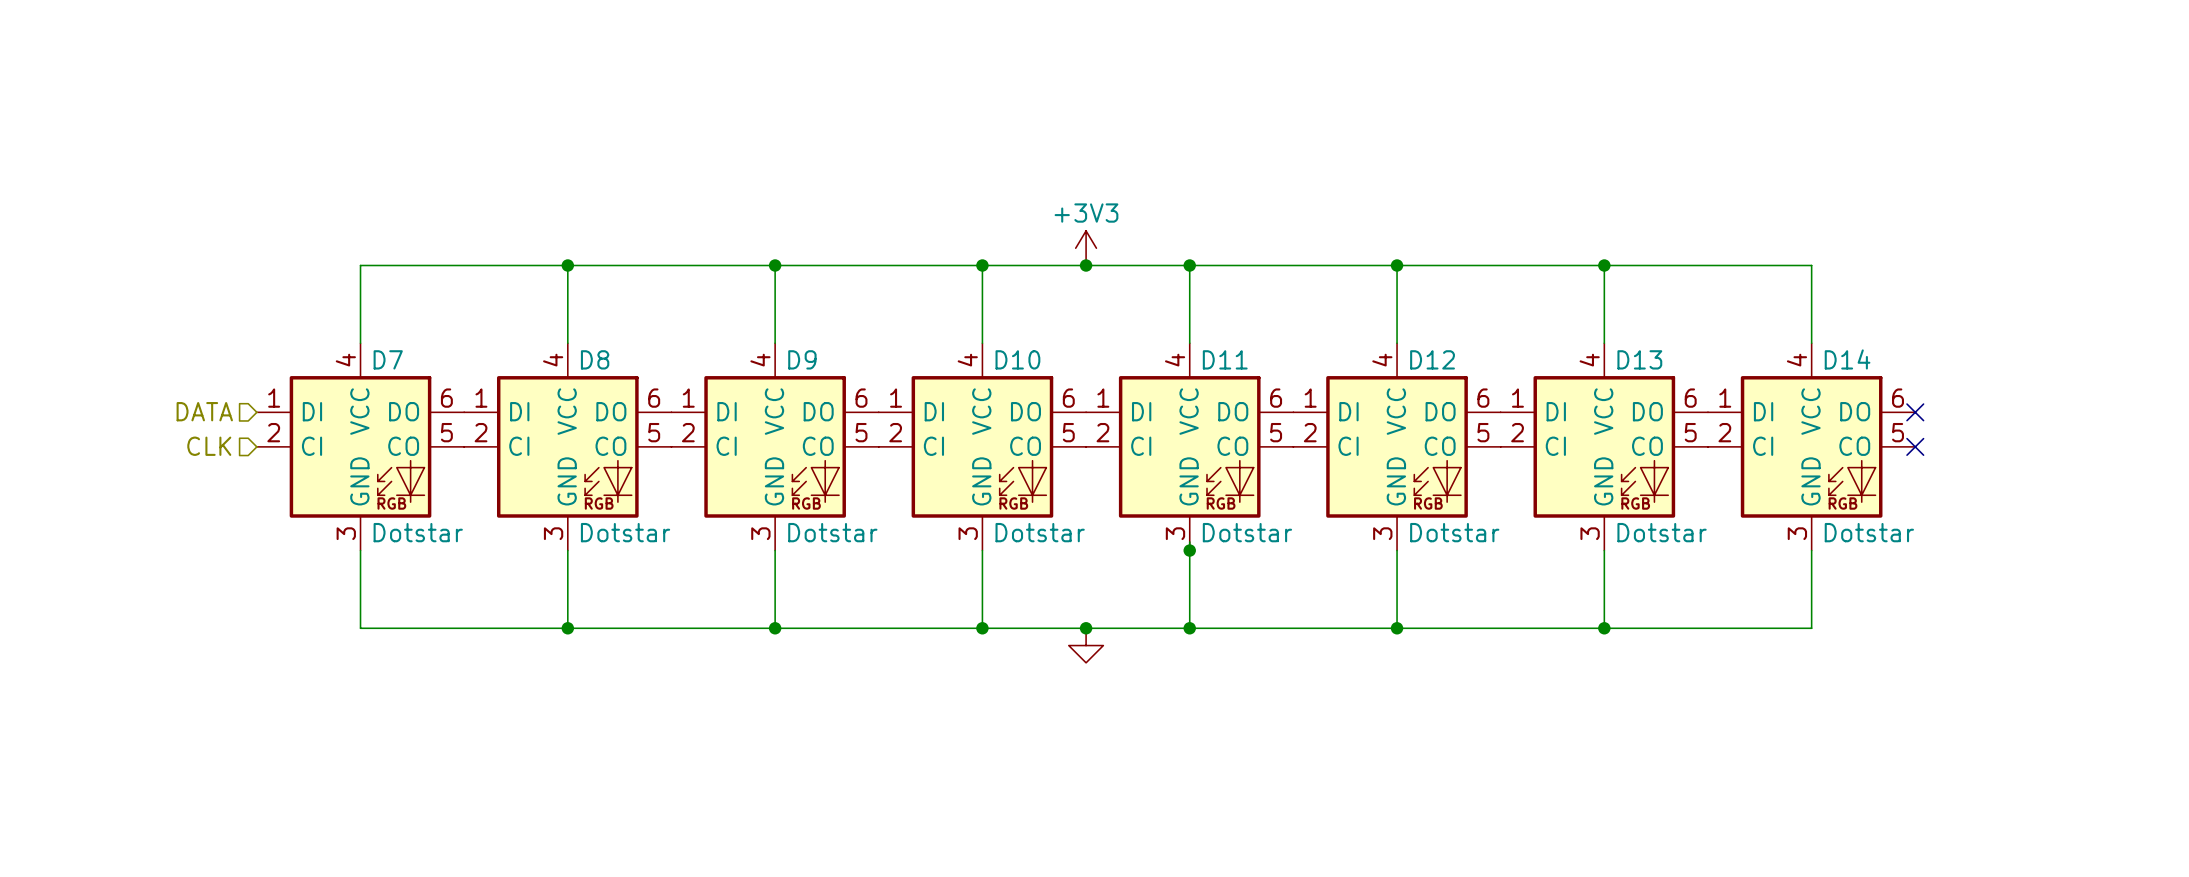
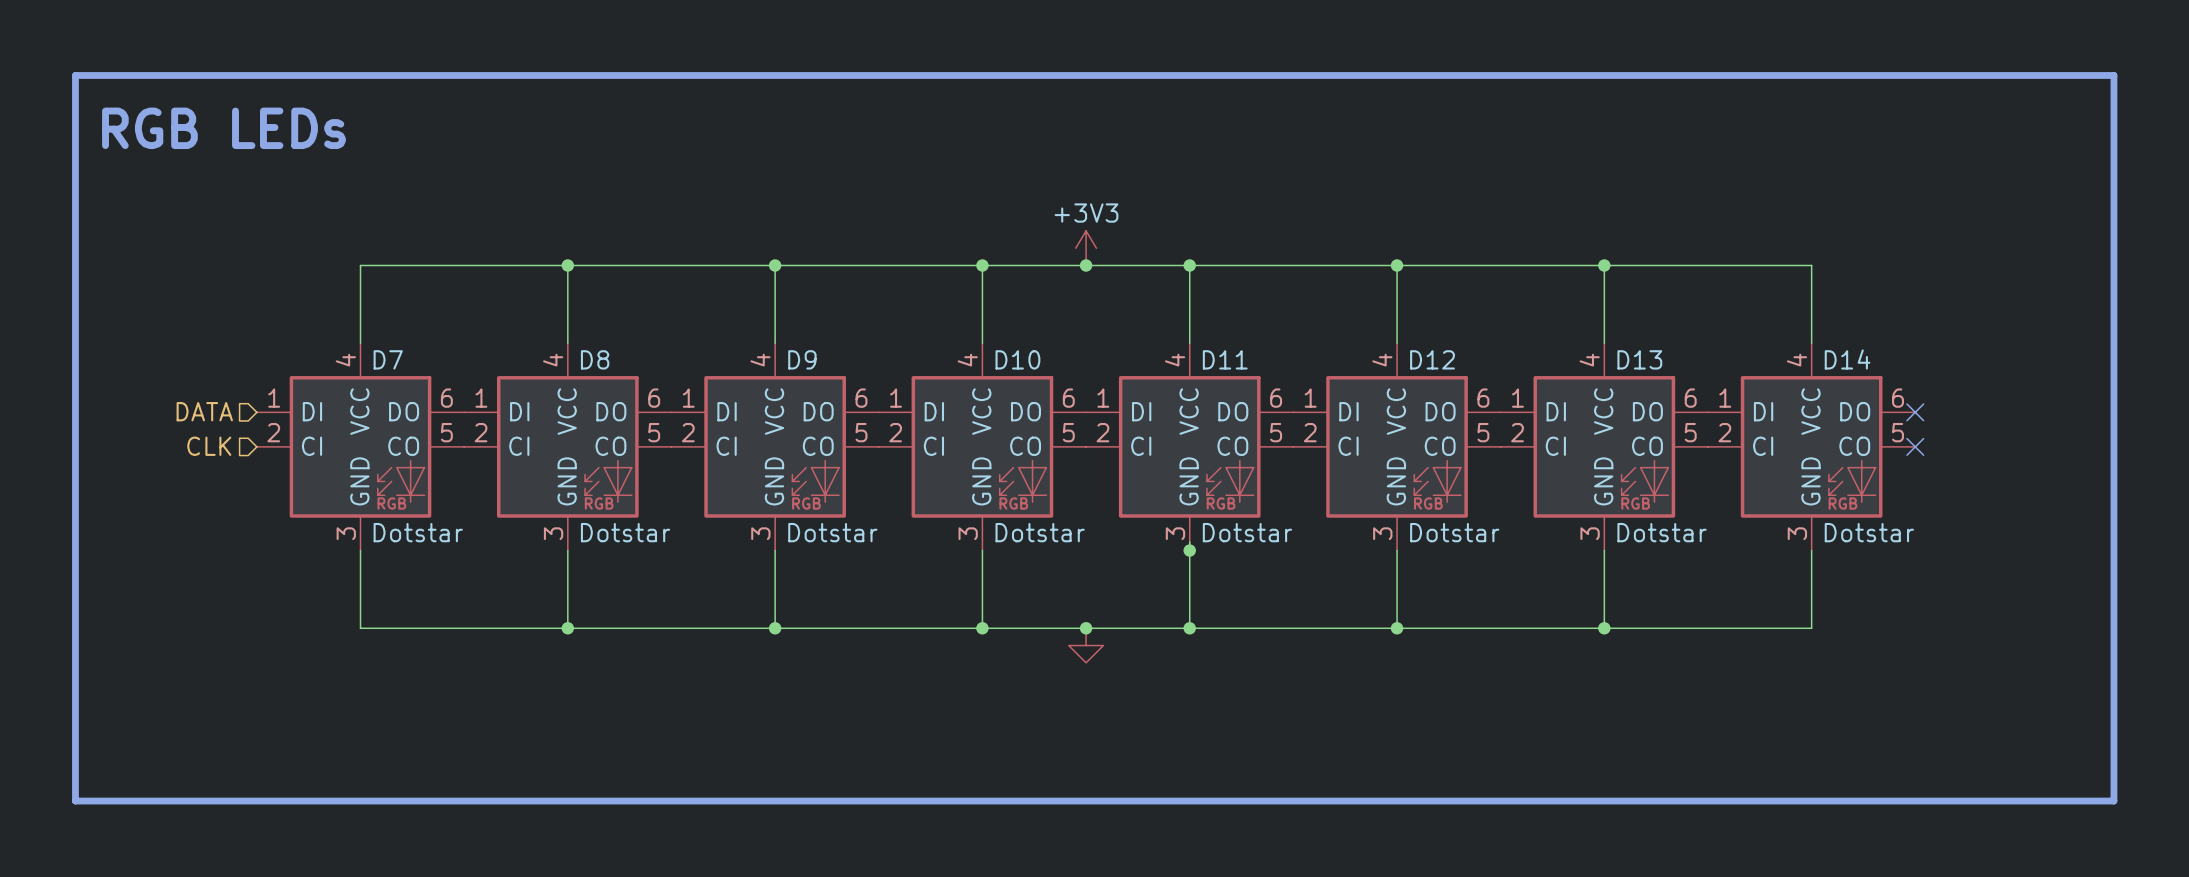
line: none -> (75, 75) (75, 801) (2113, 801) (2113, 75) (75, 75)
text: none -> RGB LEDs (223, 128)

